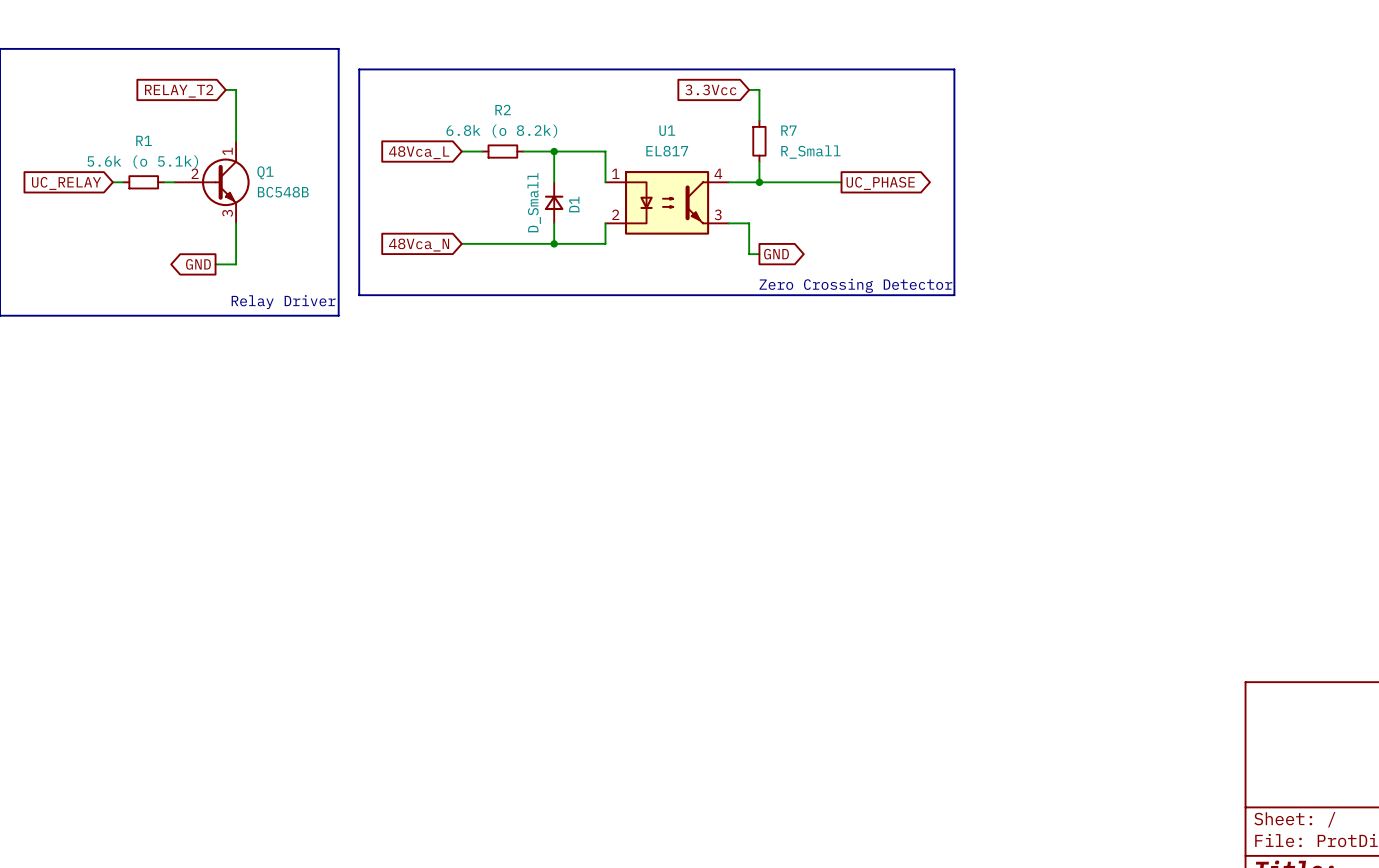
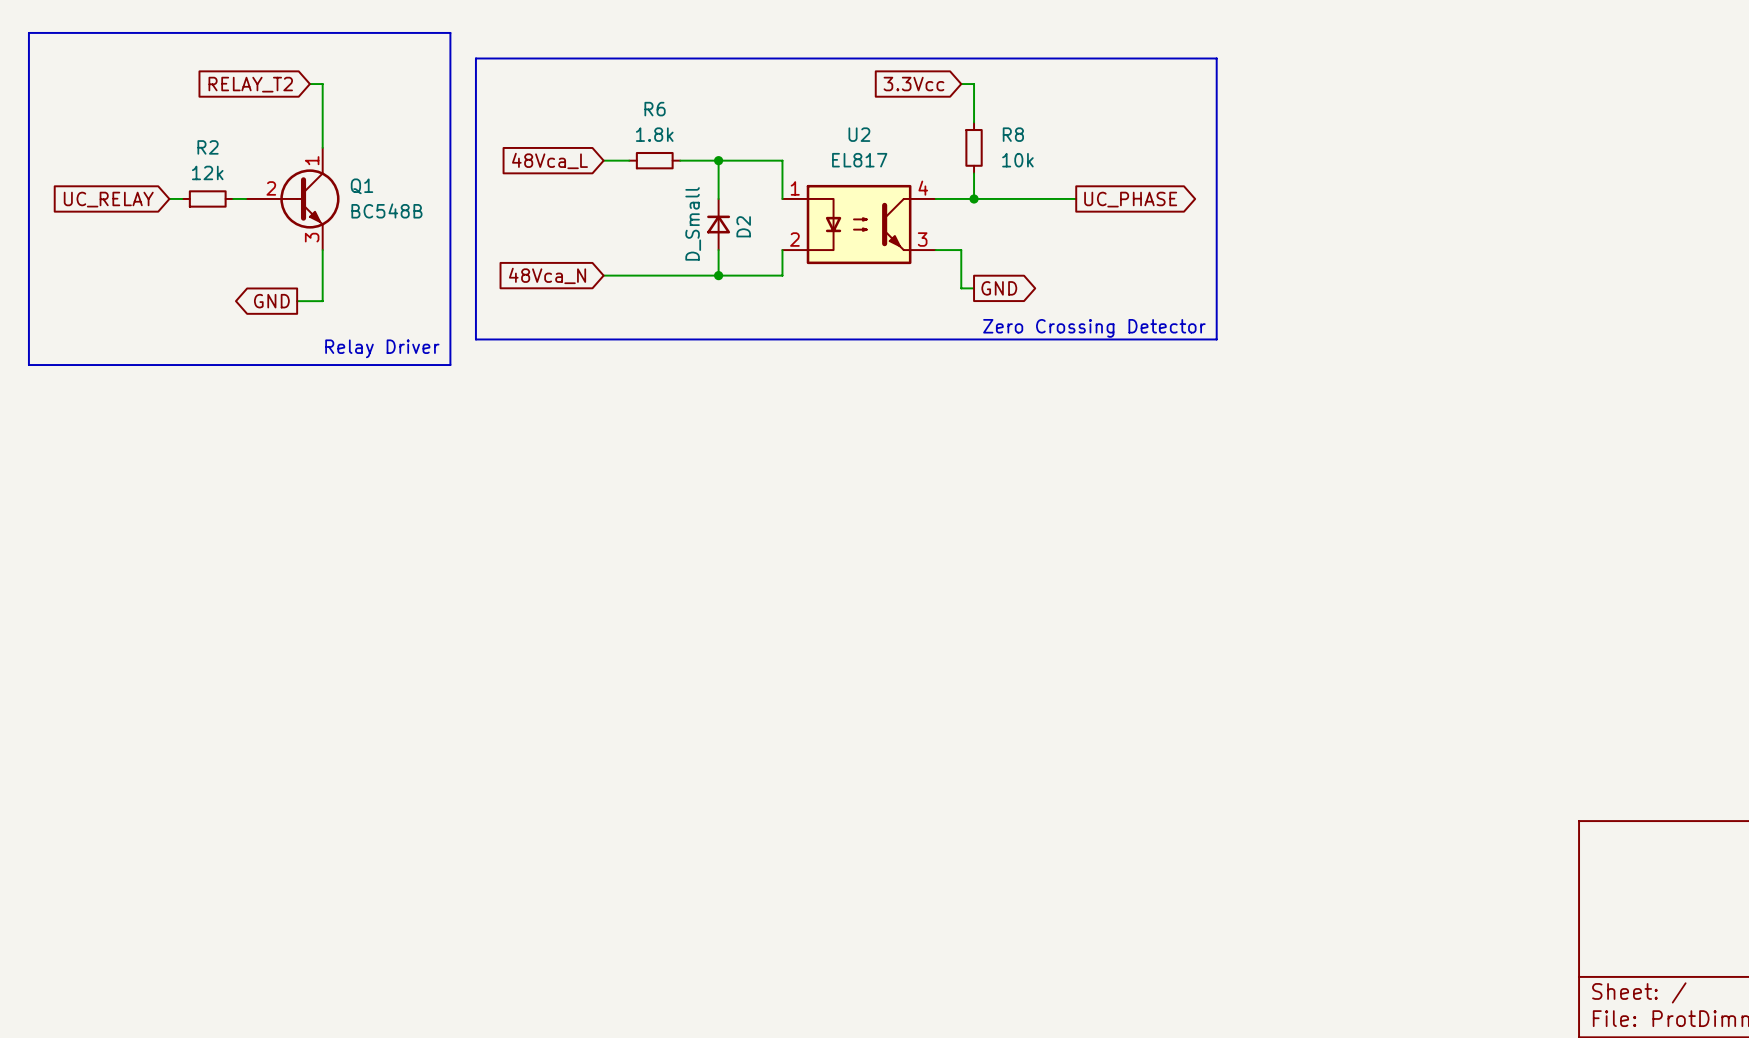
R2 name: R2 (503, 110) -> R6 (655, 109)
U1 name: U1 (667, 130) -> U2 (859, 134)
R7 name: R7 (788, 130) -> R8 (1013, 134)
R2 value: 6.8k (o 8.2k) (501, 131) -> 1.8k (654, 134)
R1 name: R1 (144, 140) -> R2 (208, 147)
R7 value: R_Small (810, 152) -> 10k (1017, 160)
R1 value: 5.6k (o 5.1k) (142, 161) -> 12k (207, 172)
D1 name: D1 (574, 204) -> D2 (743, 226)

